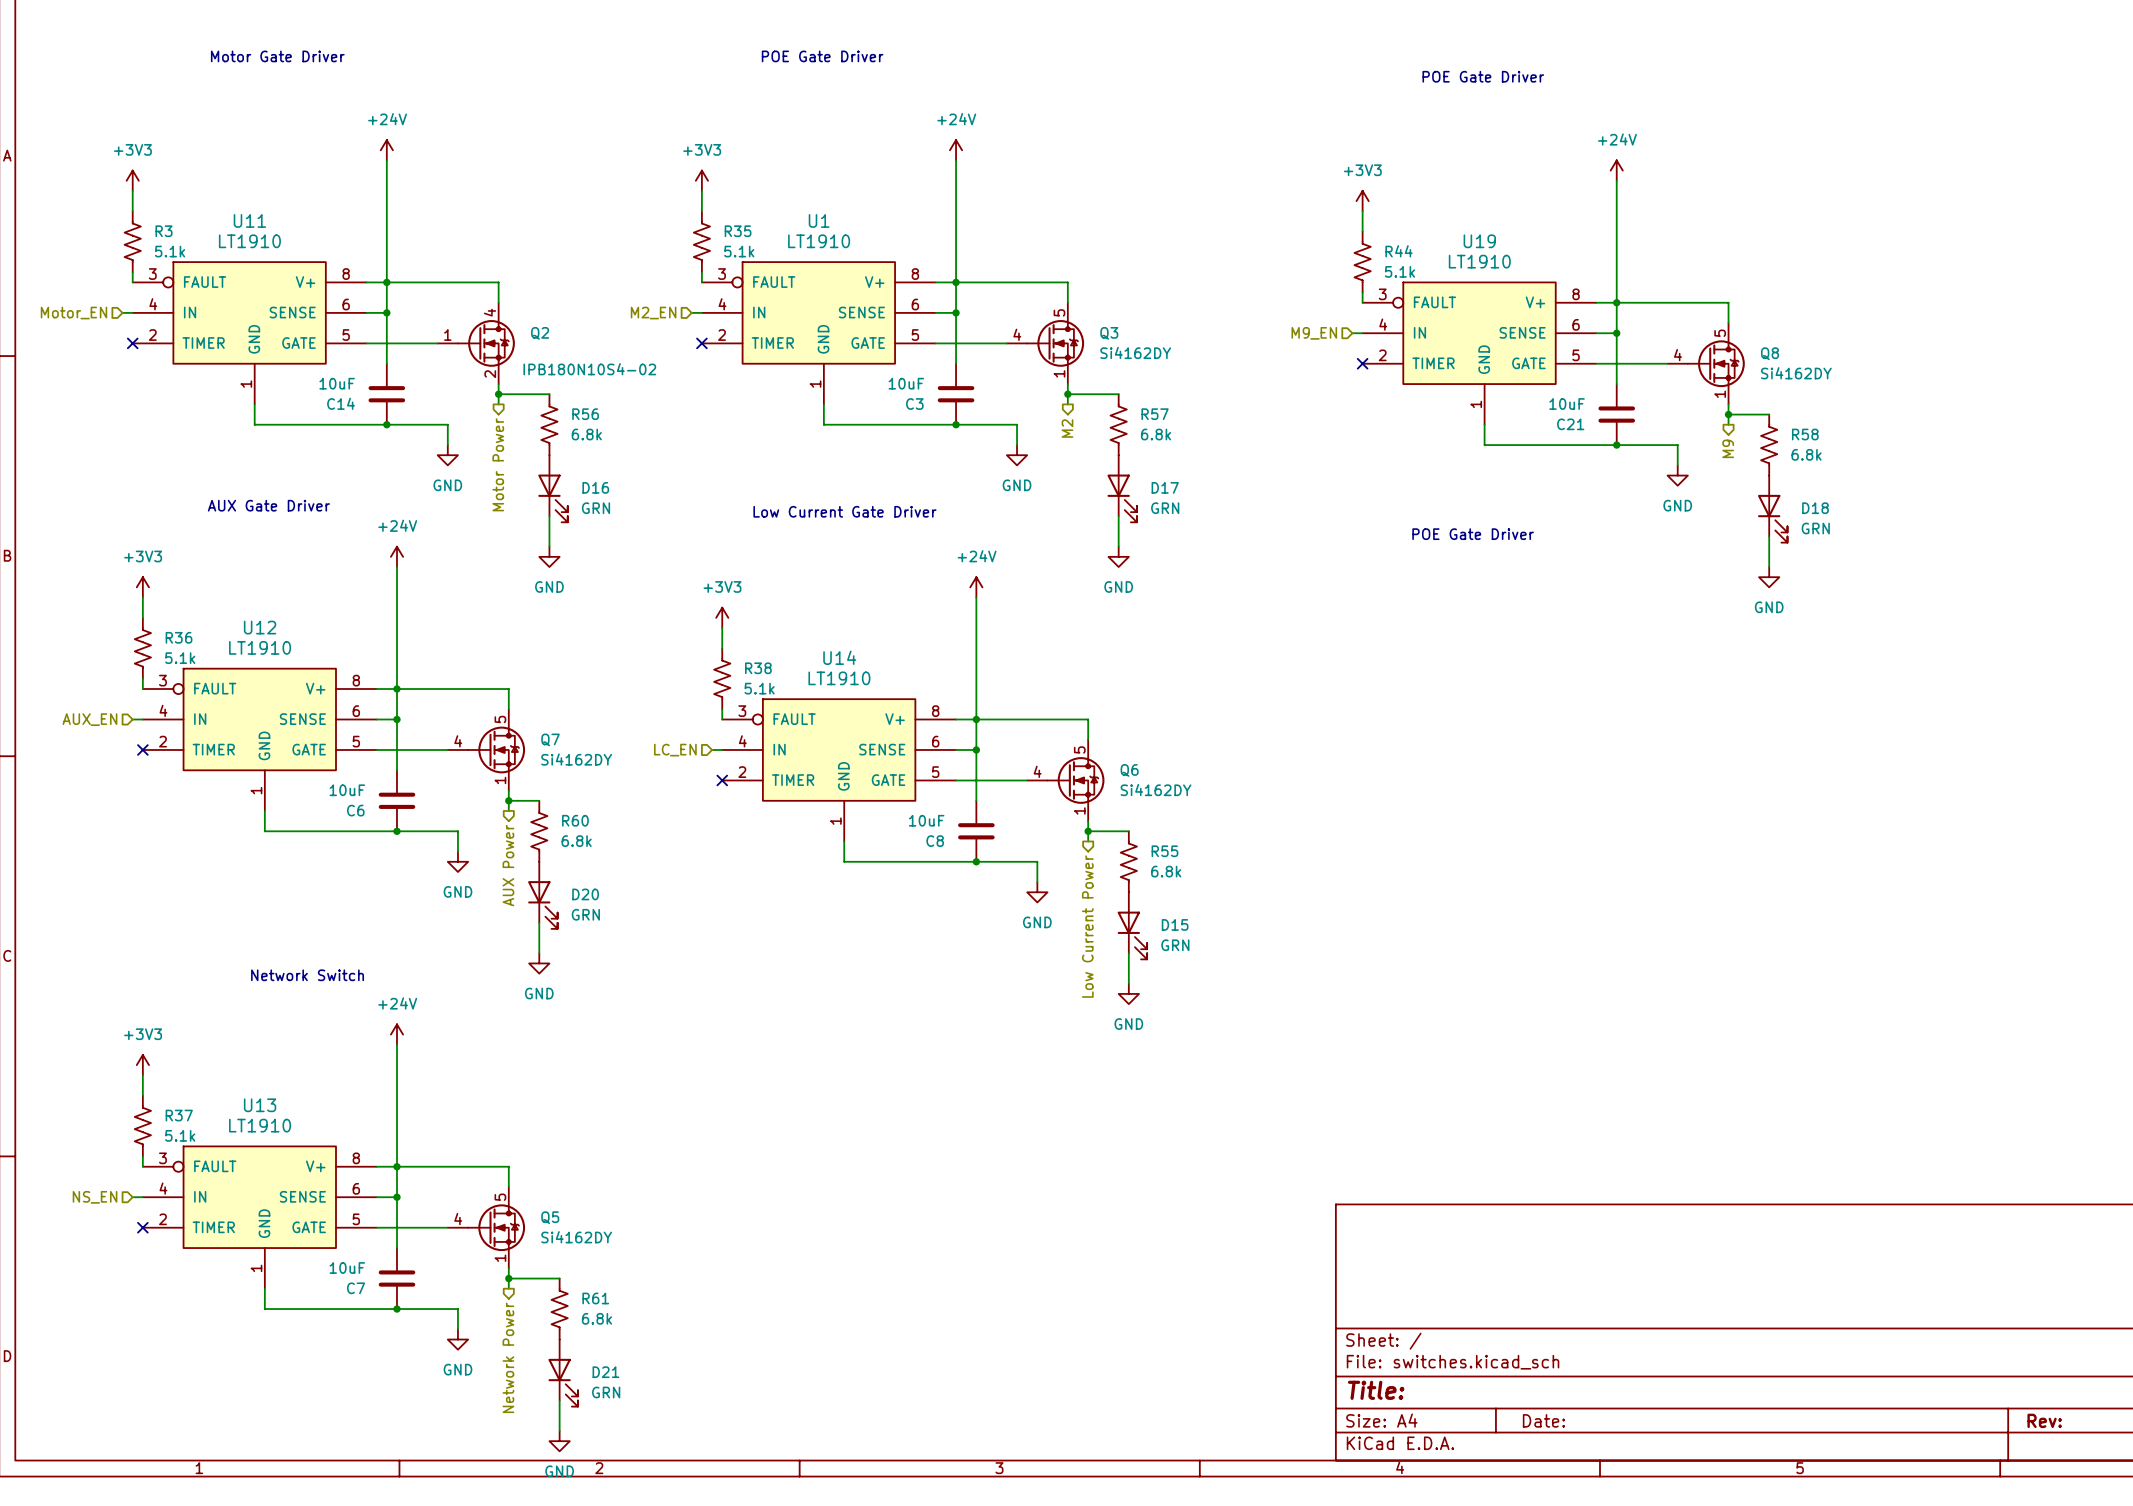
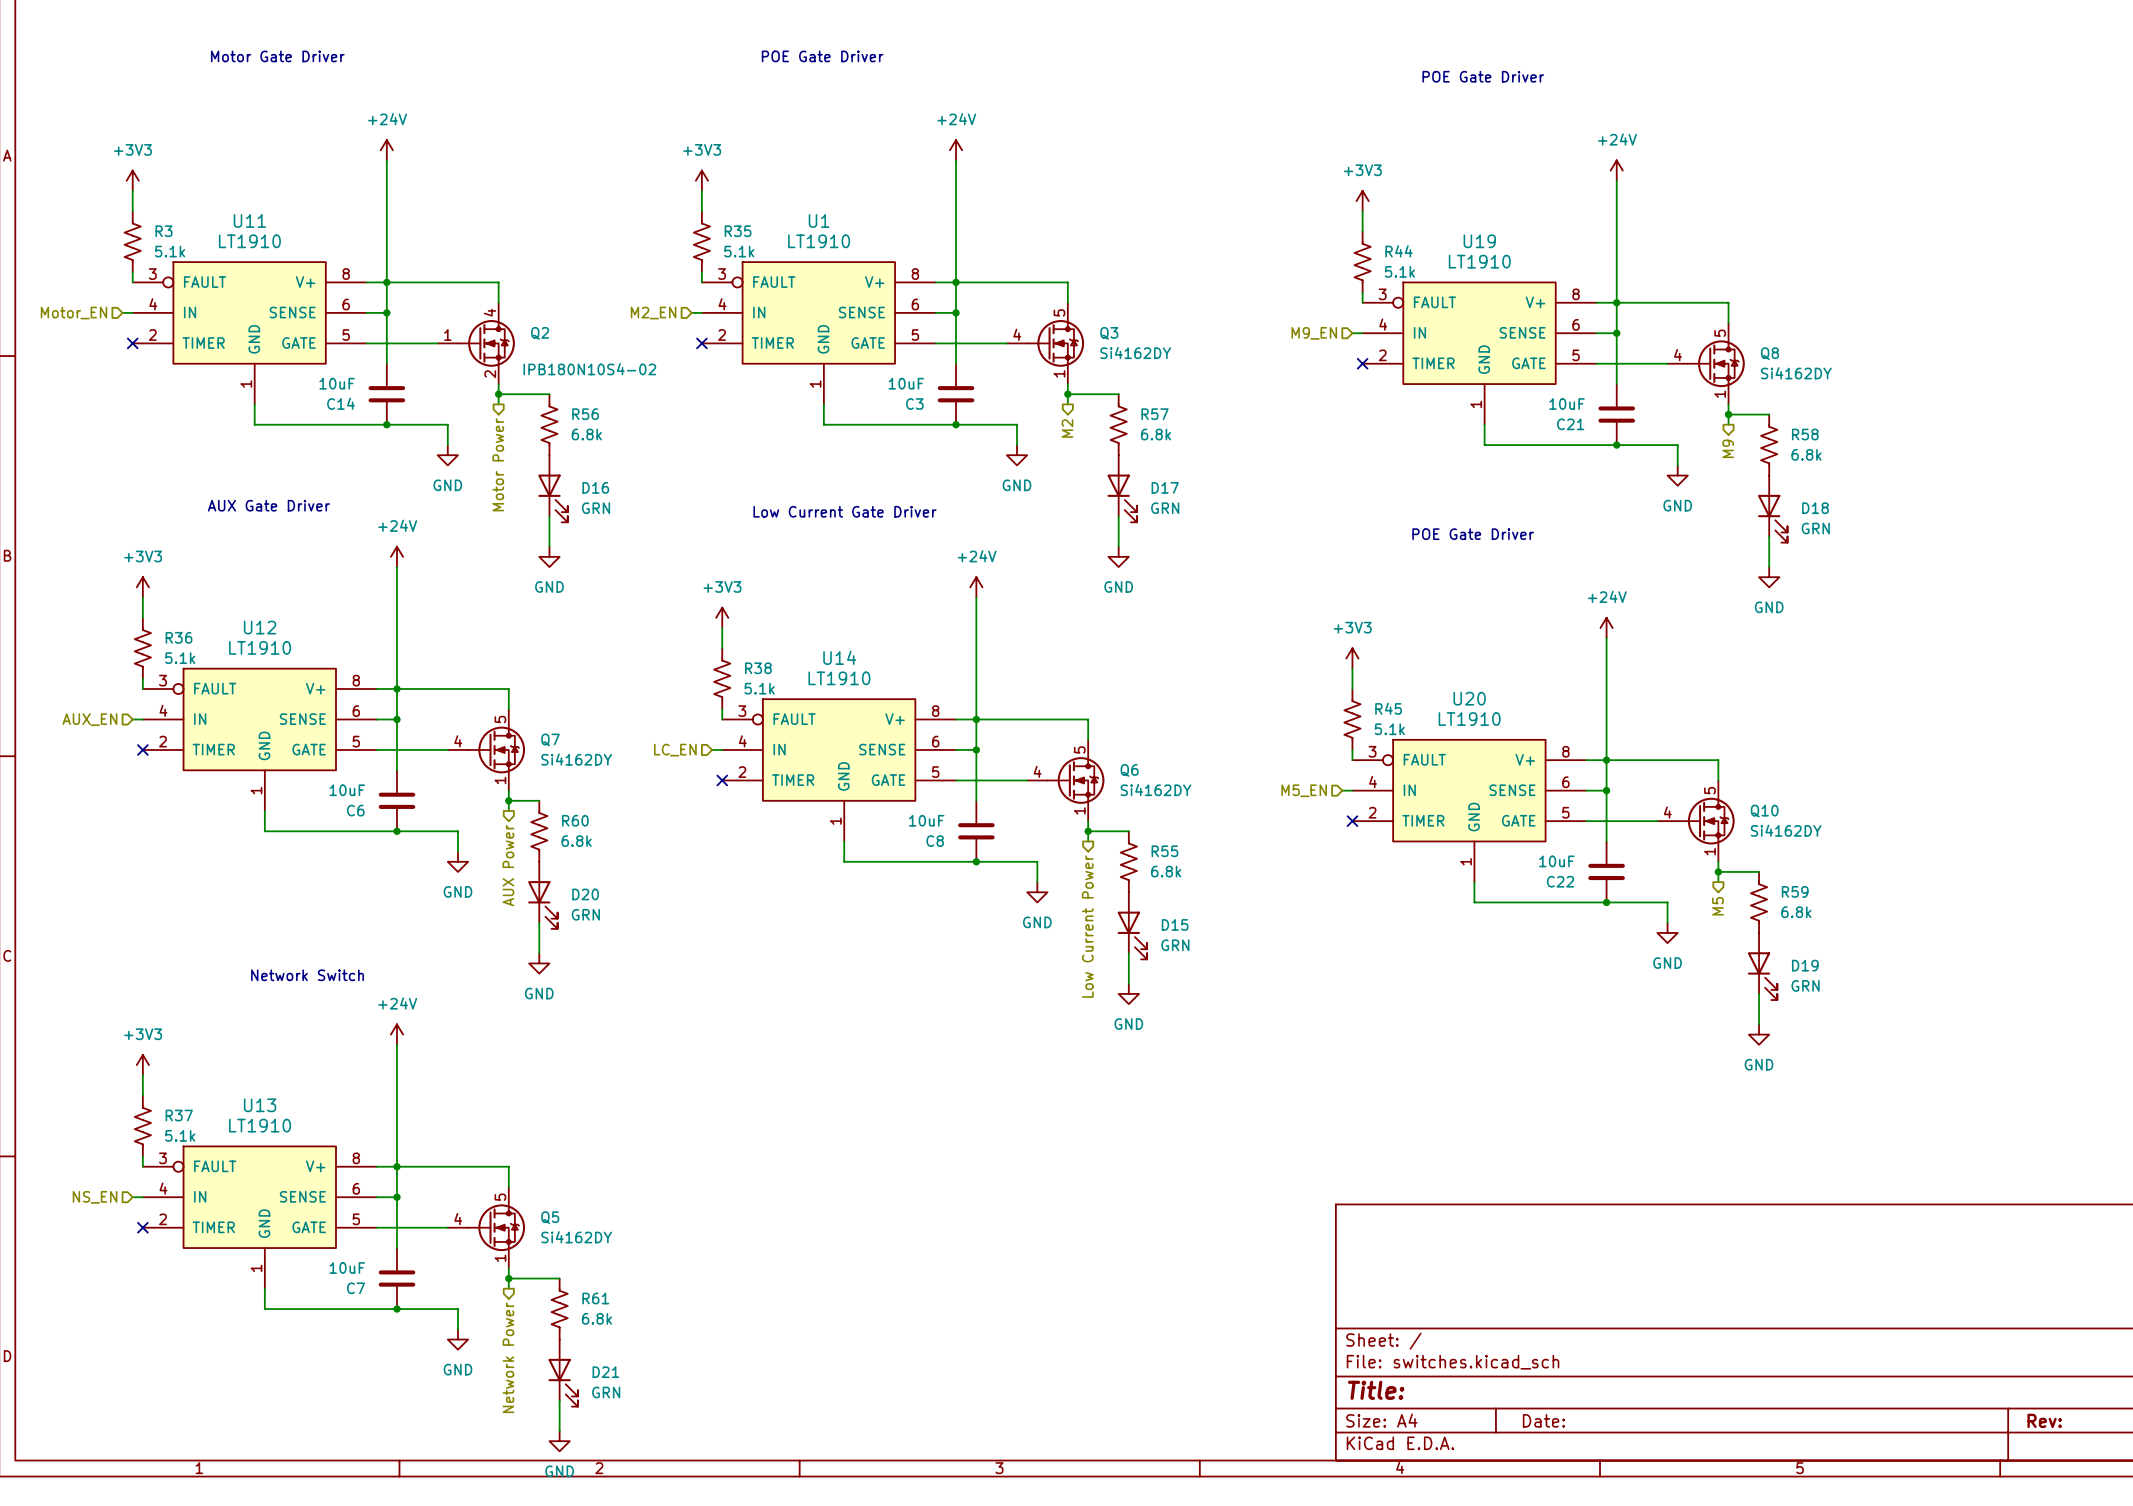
power symbol: none -> +24V (1606, 628)
wire: none -> (1606, 638) (1606, 841)
power symbol: none -> +3V3 (1352, 658)
wire: none -> (1352, 668) (1352, 689)
R45: none -> 5.1k (1352, 719)
wire: none -> (1352, 749) (1352, 760)
wire: none -> (1586, 760) (1718, 760) (1718, 780)
junction: none -> (1606, 760)
hierarchical label: none -> M5_EN (1304, 790)
wire: none -> (1342, 790) (1352, 790)
wire: none -> (1586, 790) (1606, 790)
junction: none -> (1606, 790)
U20: none -> LT1910 (1469, 810)
no-connect mark: none -> (1352, 821)
wire: none -> (1586, 821) (1657, 821)
Q10: none -> Si4162DY (1696, 821)
wire: none -> (1718, 861) (1718, 882)
C22: none -> 10uF (1606, 871)
wire: none -> (1718, 871) (1759, 871)
junction: none -> (1718, 871)
wire: none -> (1474, 882) (1474, 902) (1667, 902) (1667, 922)
junction: none -> (1606, 902)
R59: none -> 6.8k (1759, 902)
hierarchical label: none -> M5 (1717, 906)
power symbol: none -> GND (1667, 932)
D19: none -> GRN (1762, 966)
wire: none -> (1759, 993) (1759, 1024)
power symbol: none -> GND (1759, 1034)

